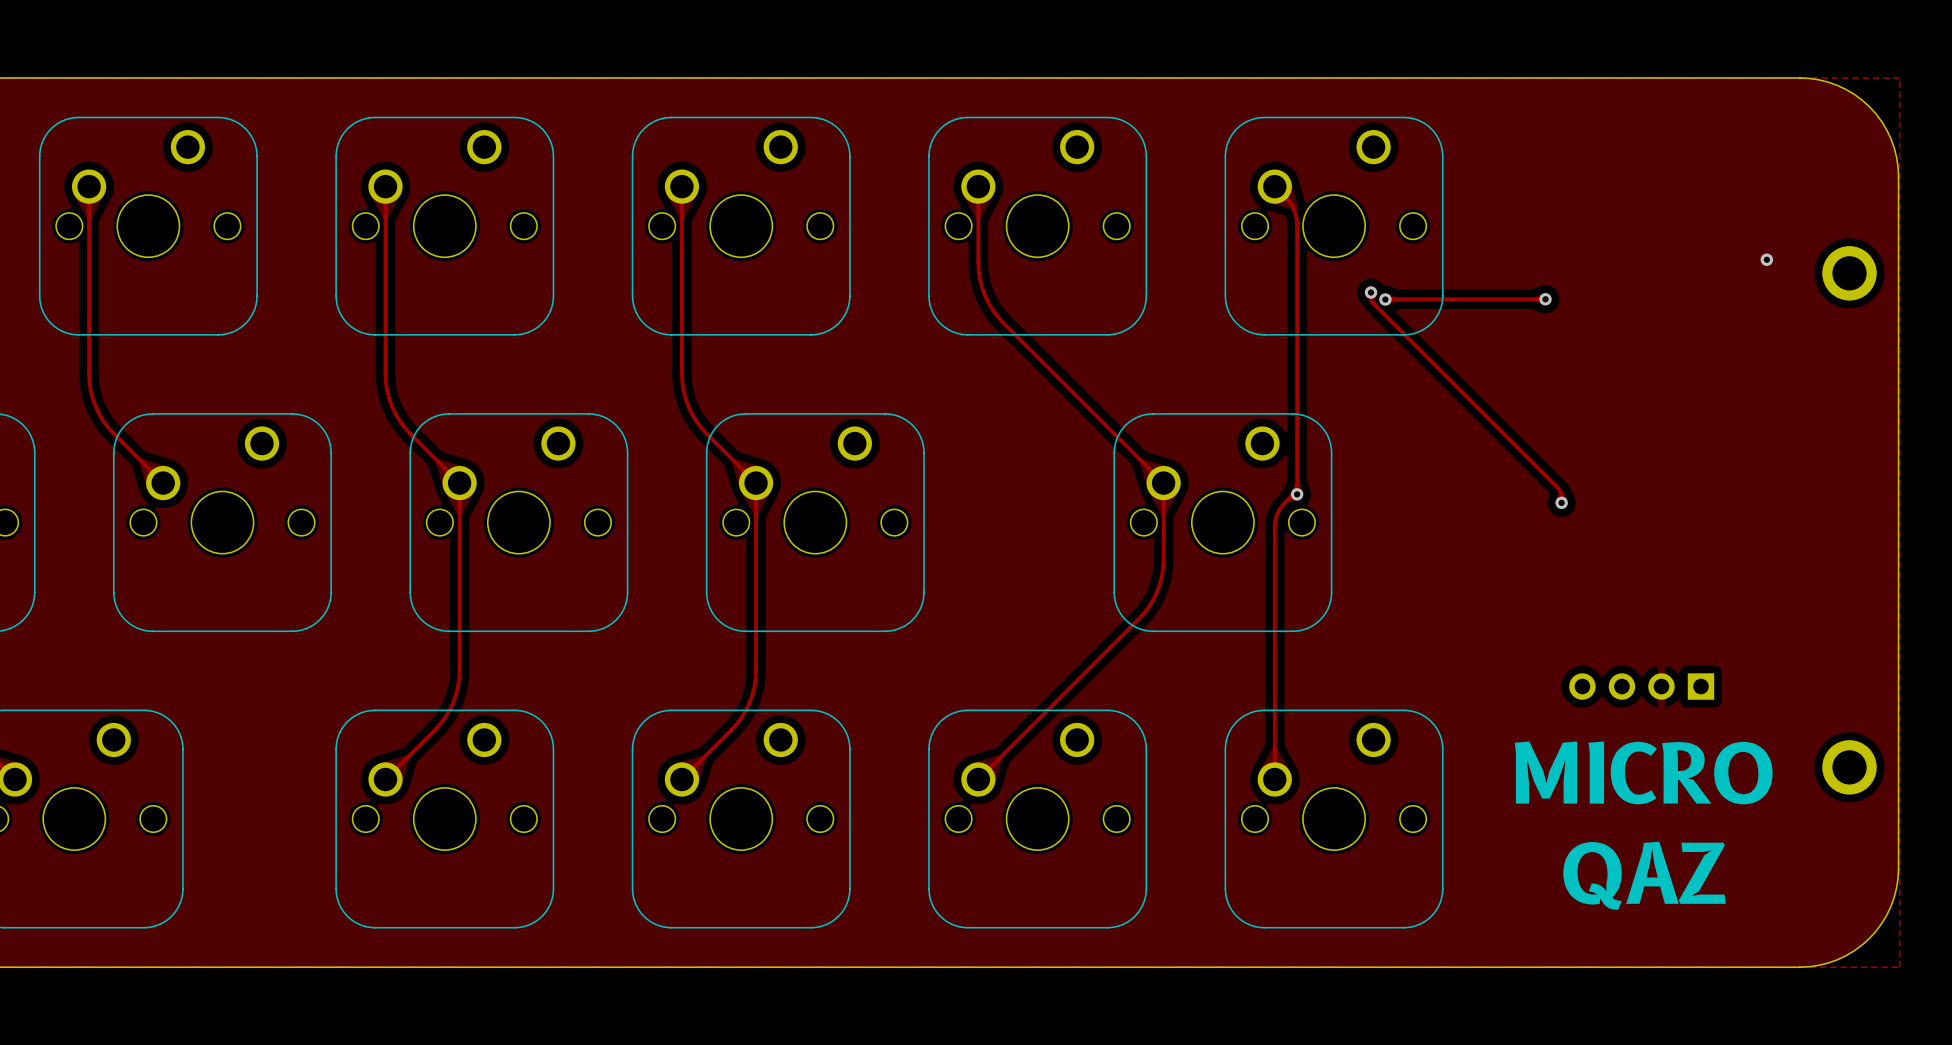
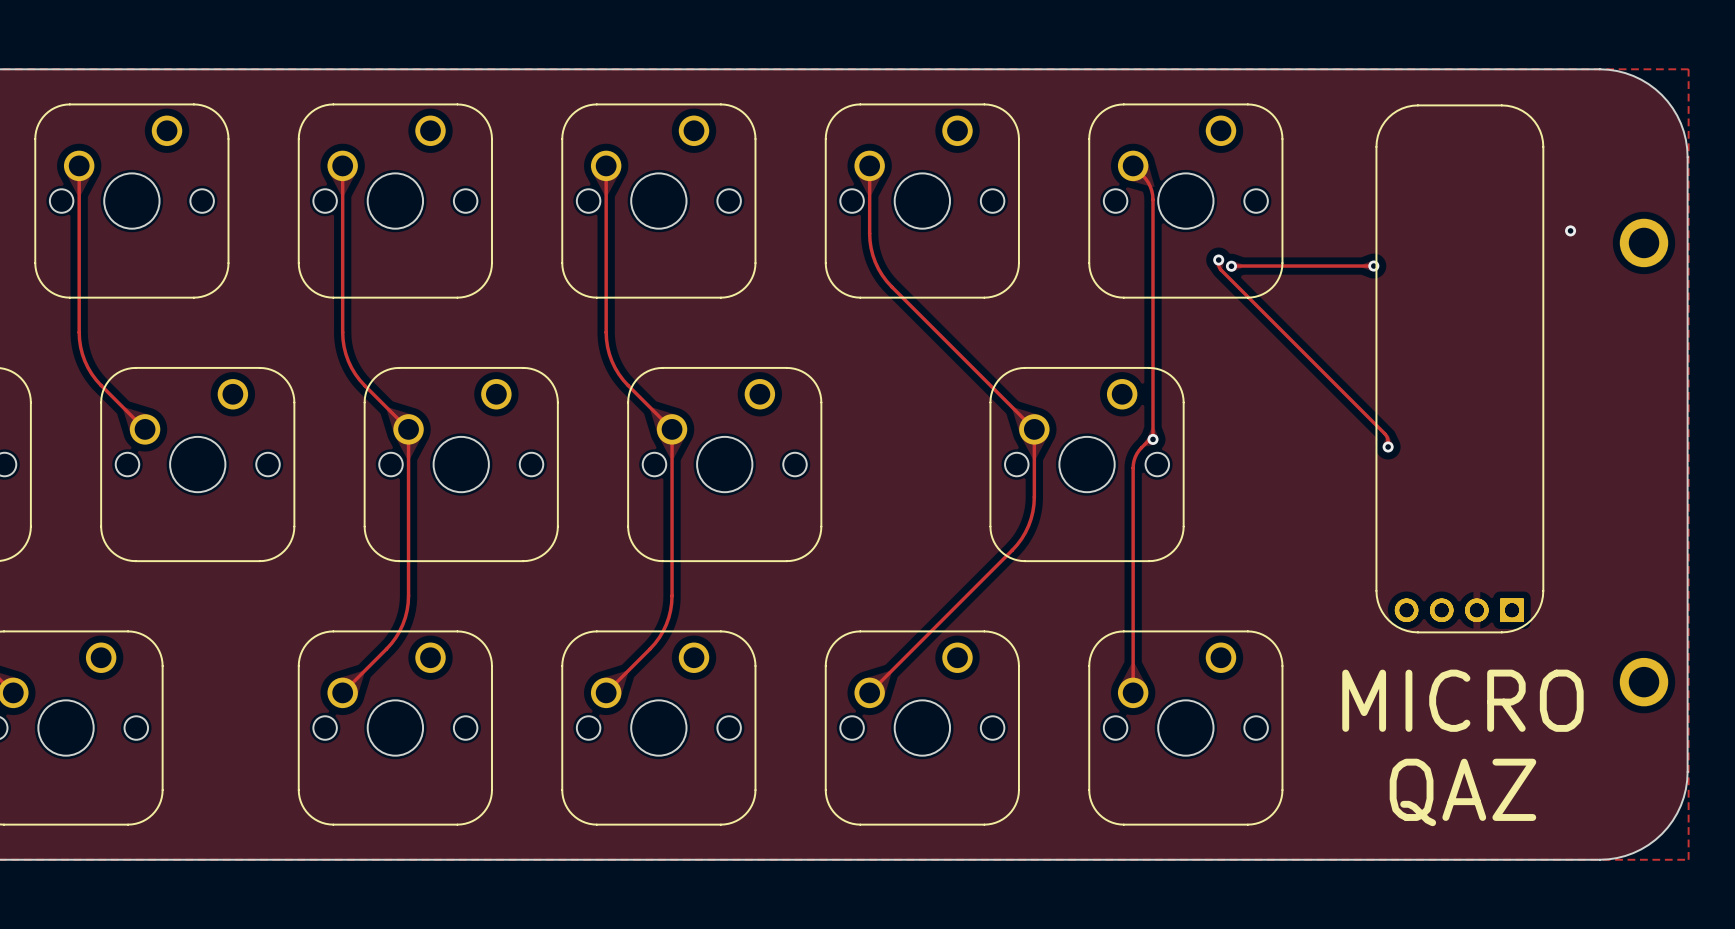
part: none -> (1459, 368)
text position: MICRO (1643, 772) -> MICRO (1462, 700)
text position: QAZ (1644, 875) -> QAZ (1462, 792)

